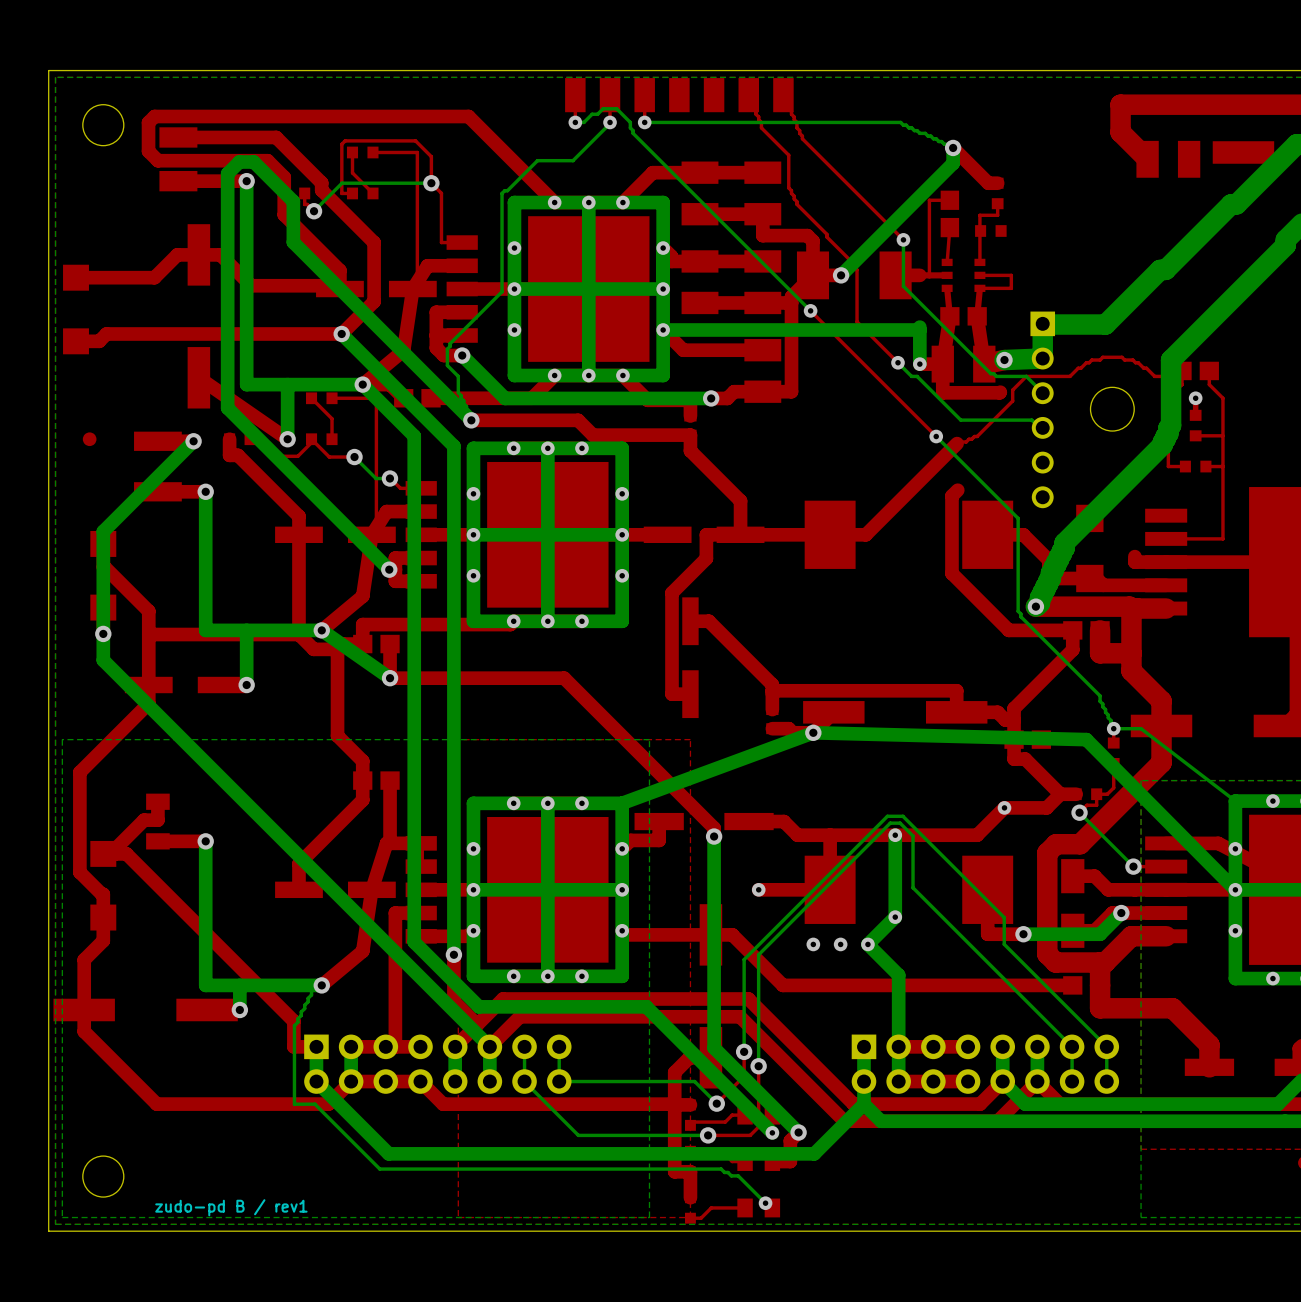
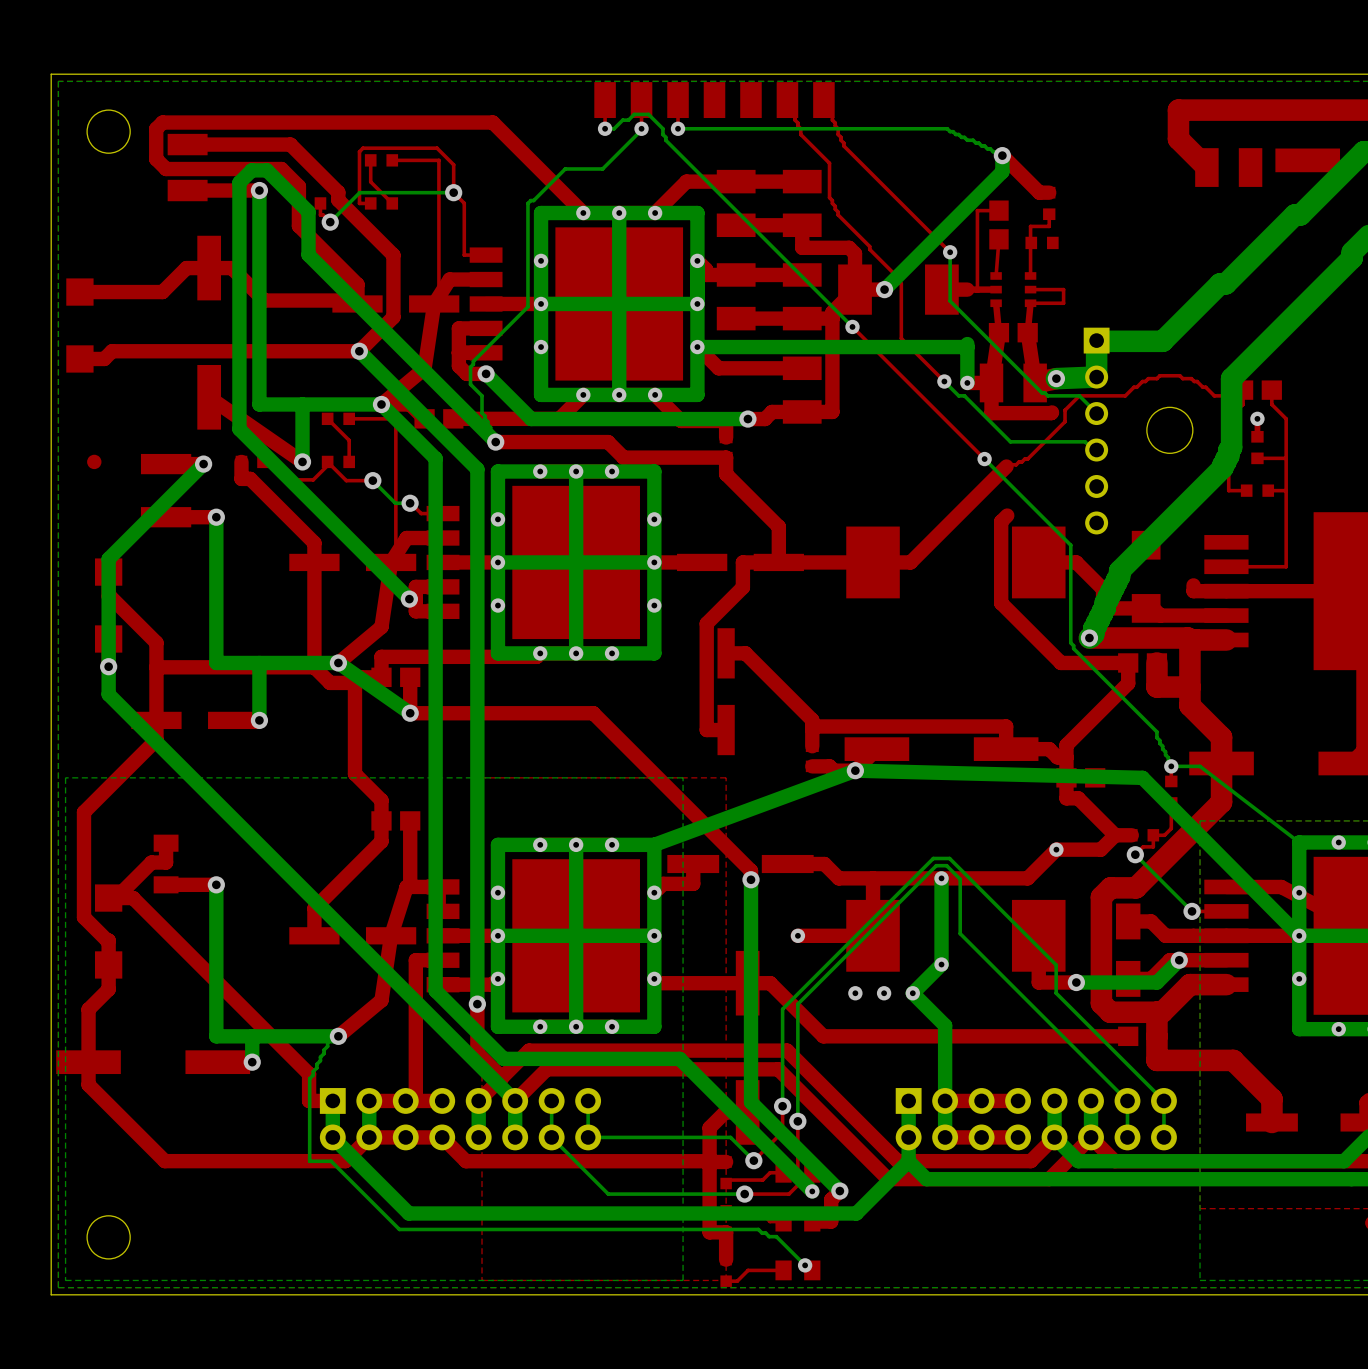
text: zudo-pd B / rev1 (231, 1207) -> none

